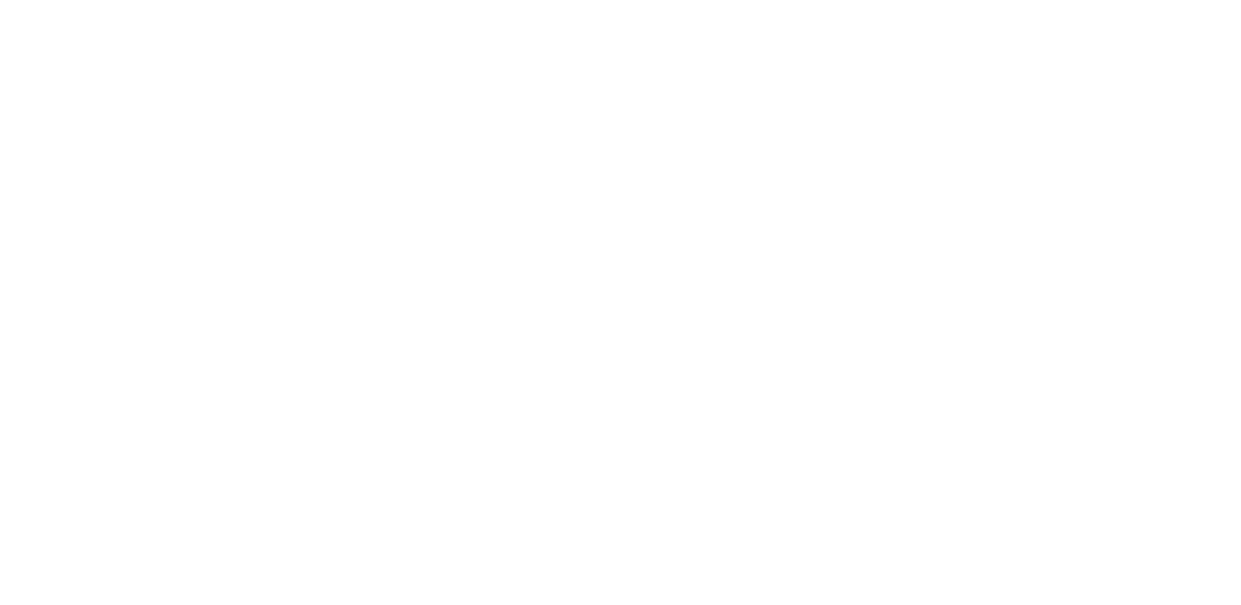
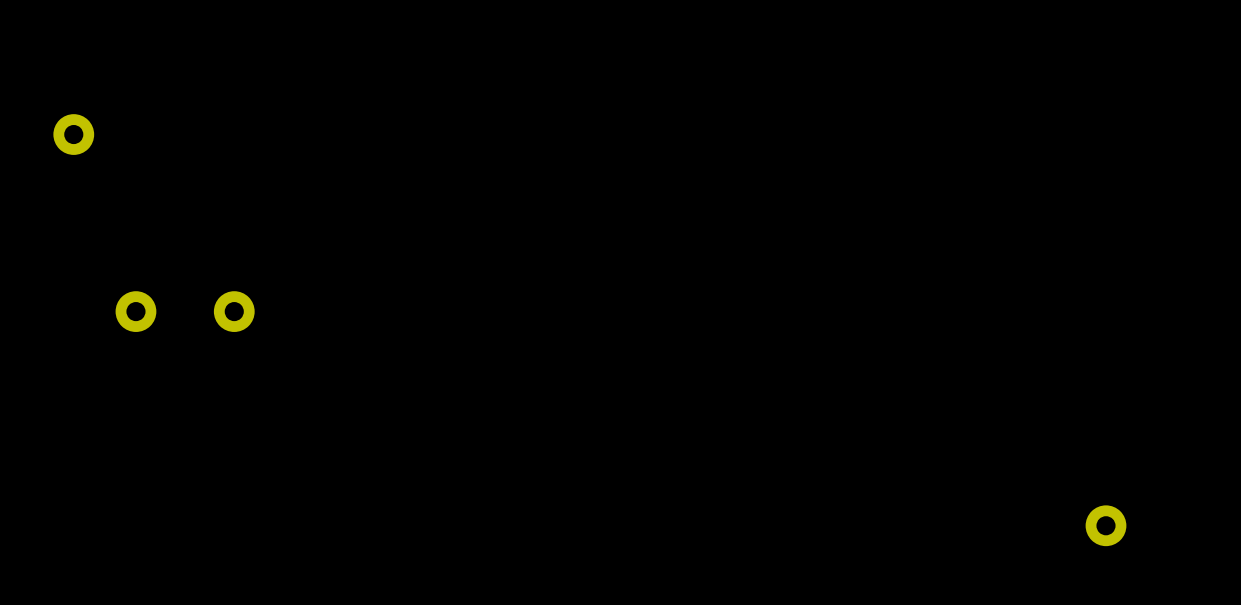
part: none -> (73, 134)
part: none -> (135, 311)
part: none -> (234, 311)
part: none -> (1106, 525)

